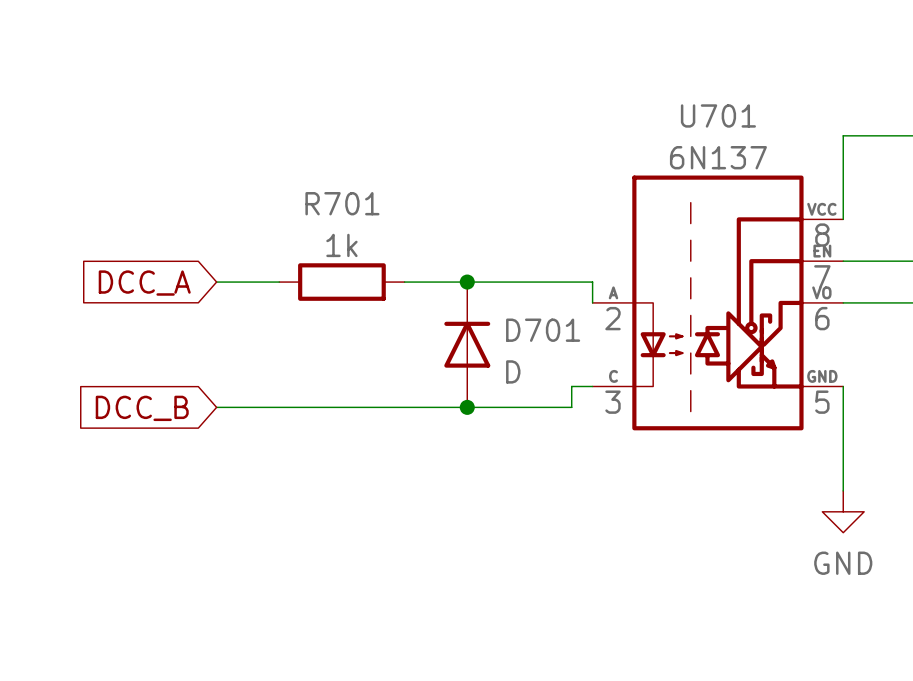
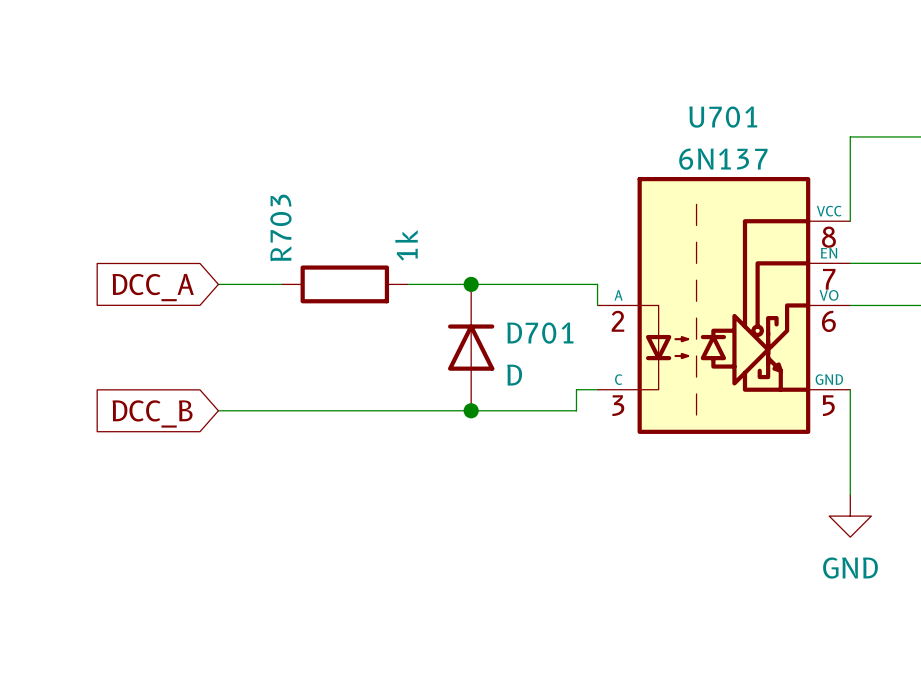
R701 name: R701 (342, 203) -> R703 (280, 227)
R701 value rotation: 0° (341, 245) -> 90° counterclockwise (406, 245)
R701 value position: 1k (341, 245) -> 1k (406, 245)

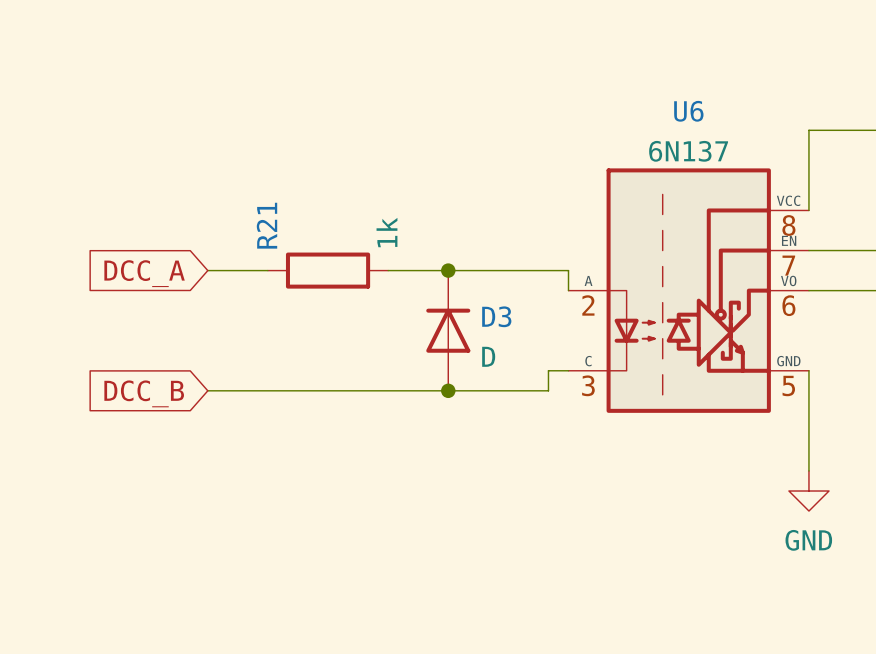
U701 name: U701 (723, 117) -> U6 (688, 111)
R703 name: R703 (280, 227) -> R21 (266, 225)
D701 name: D701 (540, 333) -> D3 (496, 316)

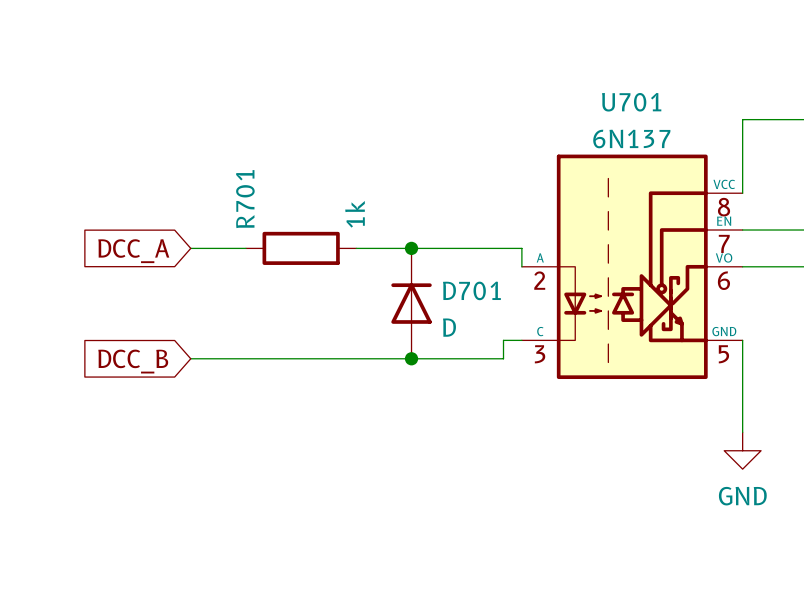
U6 name: U6 (688, 111) -> U701 (631, 102)
R21 name: R21 (266, 225) -> R701 (245, 199)
D3 name: D3 (496, 316) -> D701 (471, 290)

